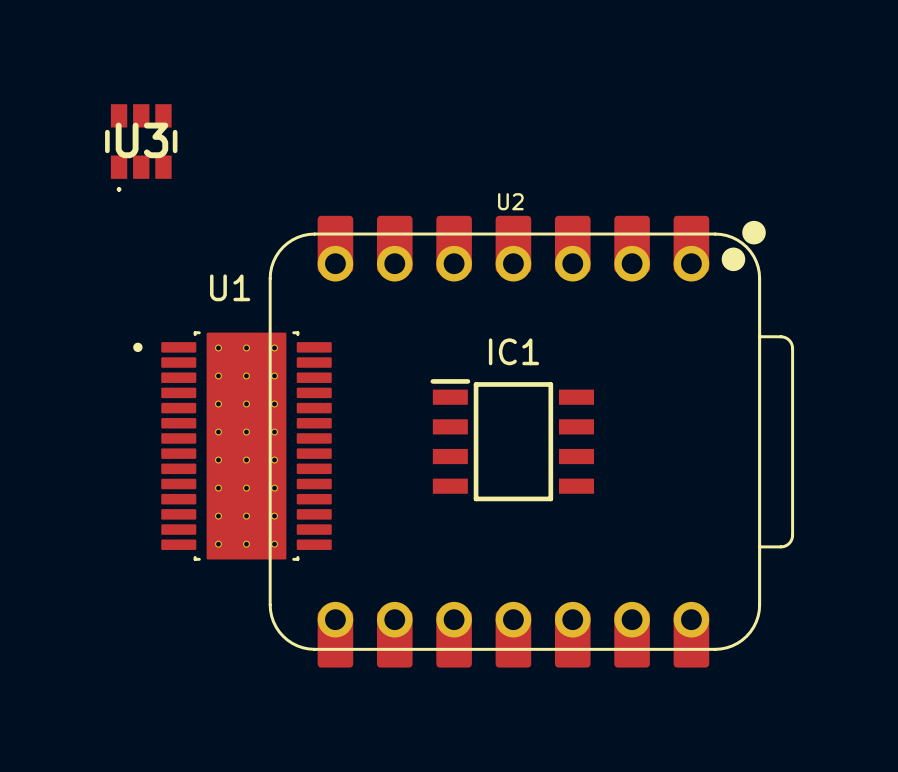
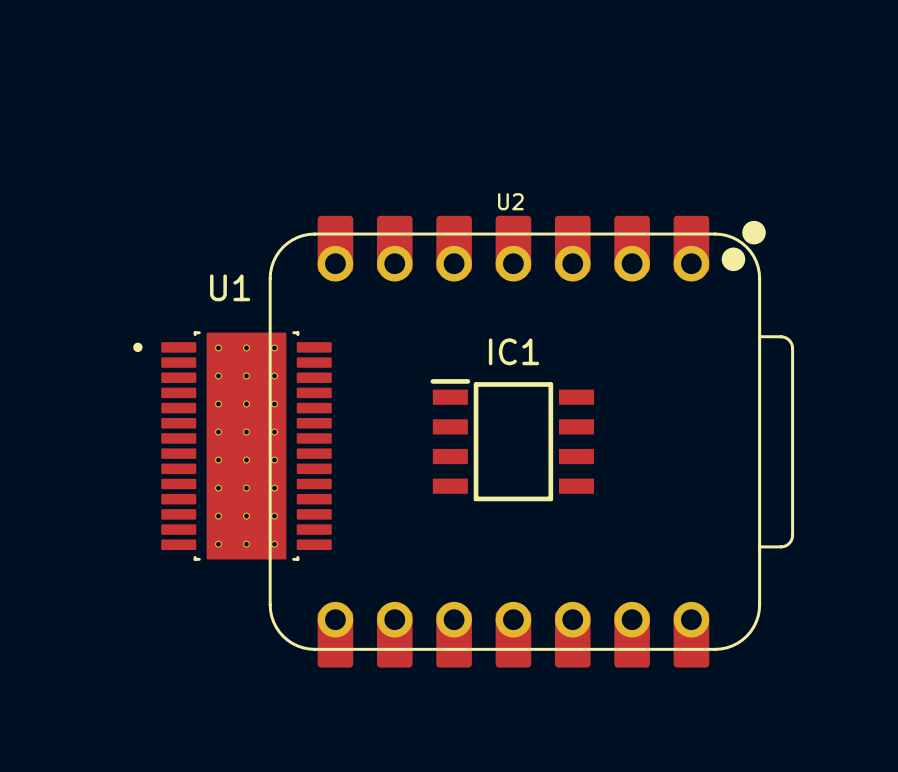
U3: (141, 147) -> none

